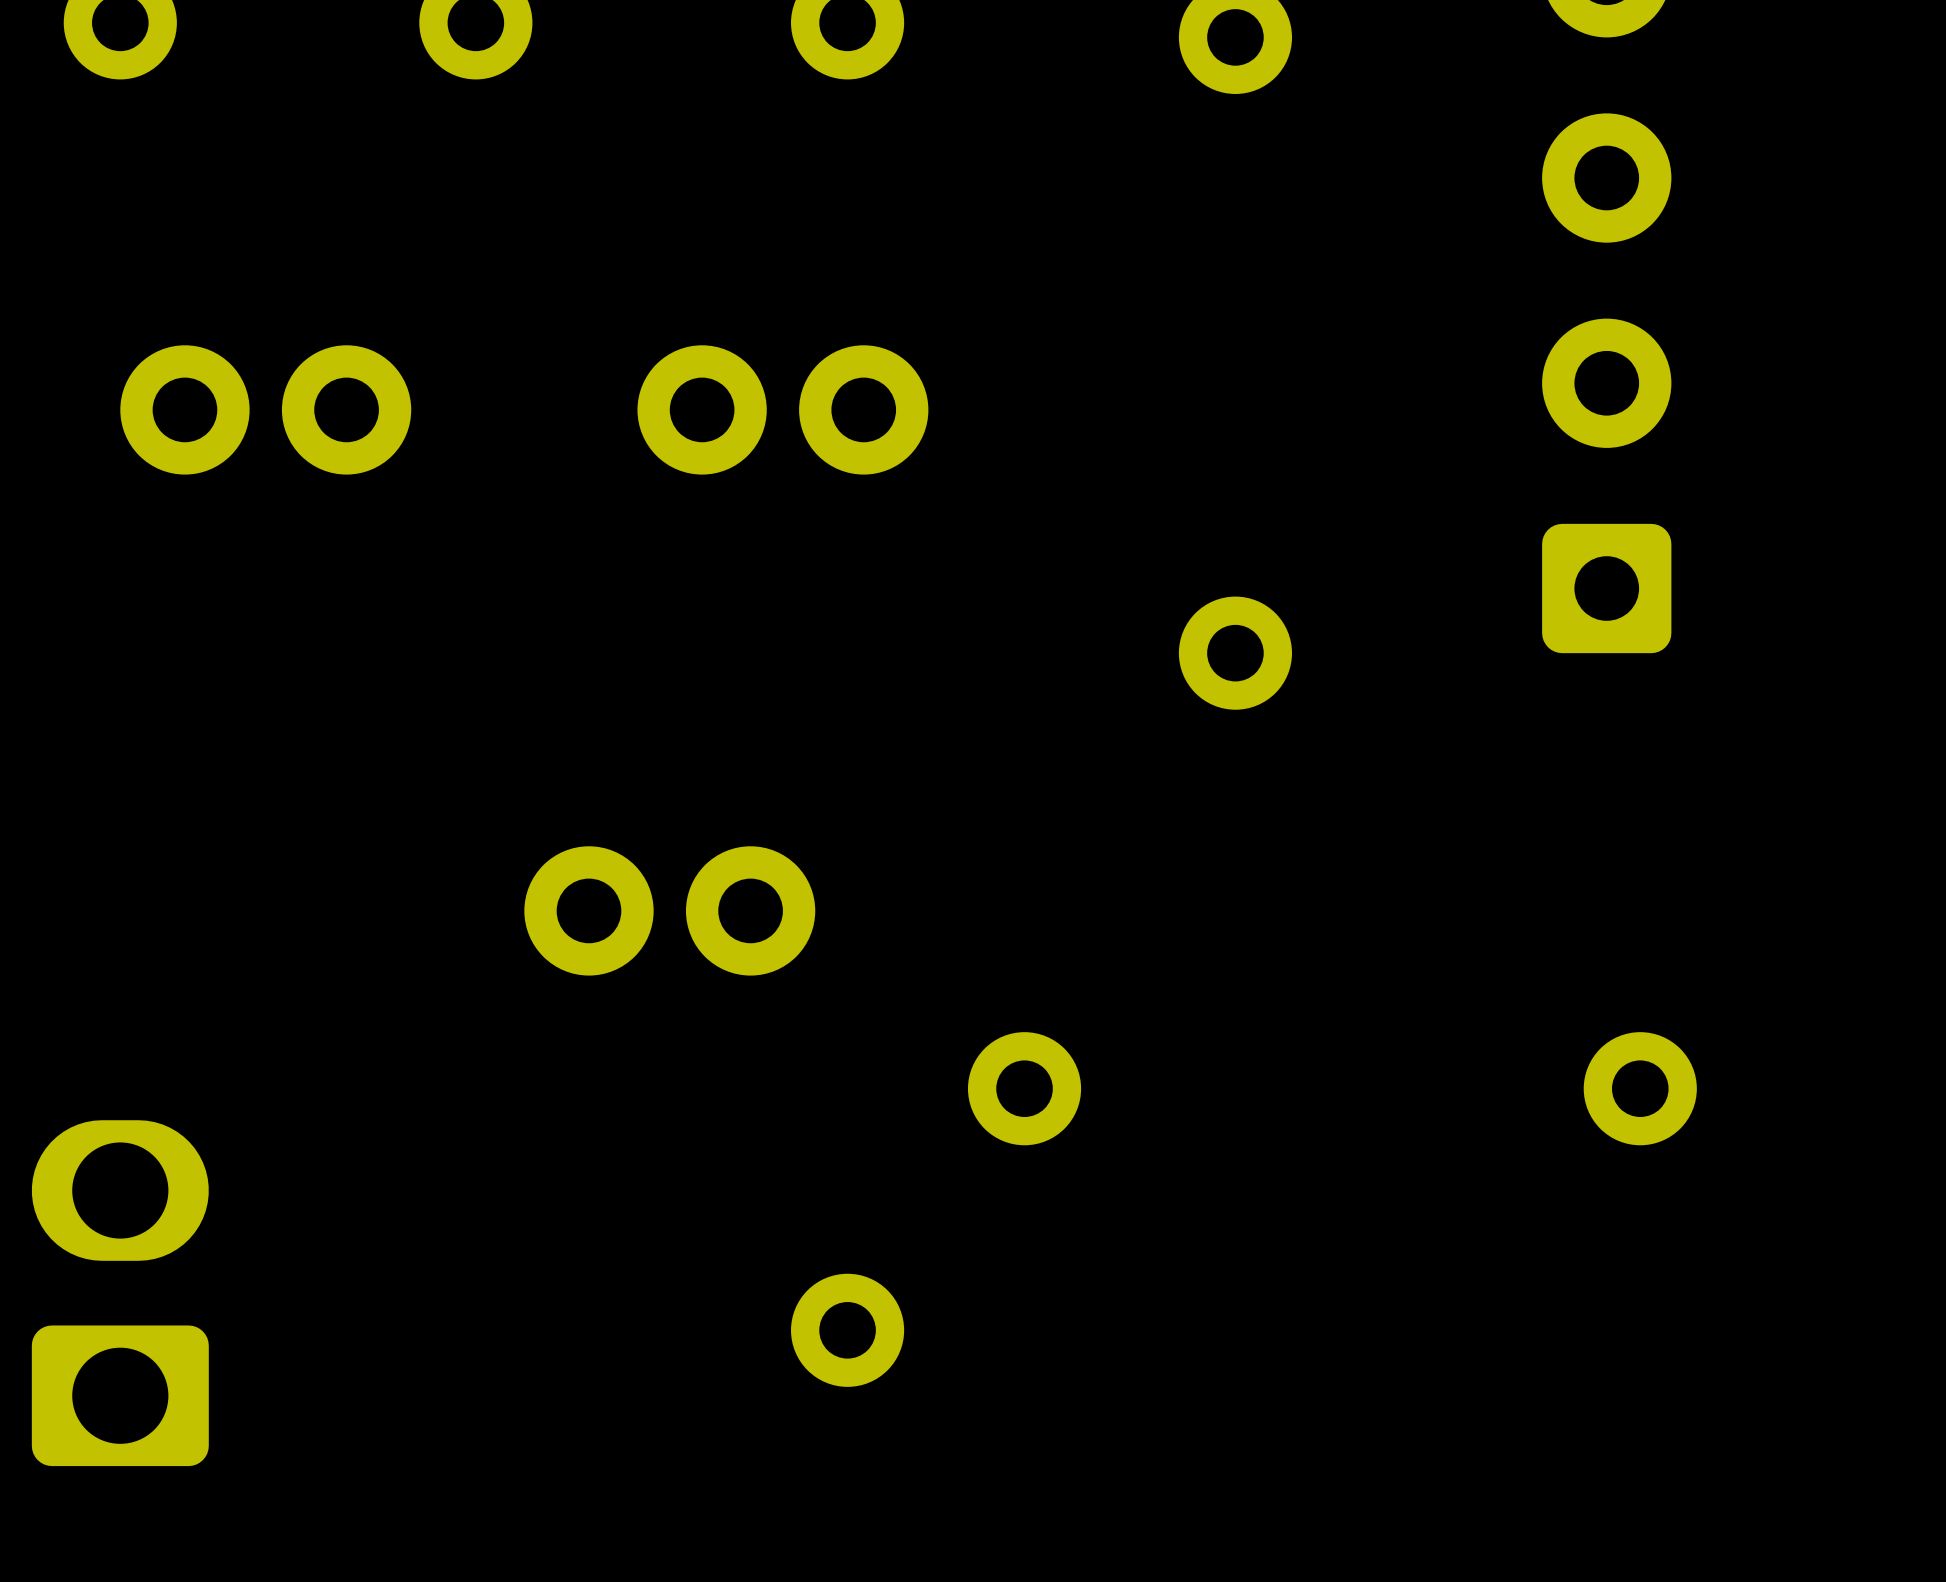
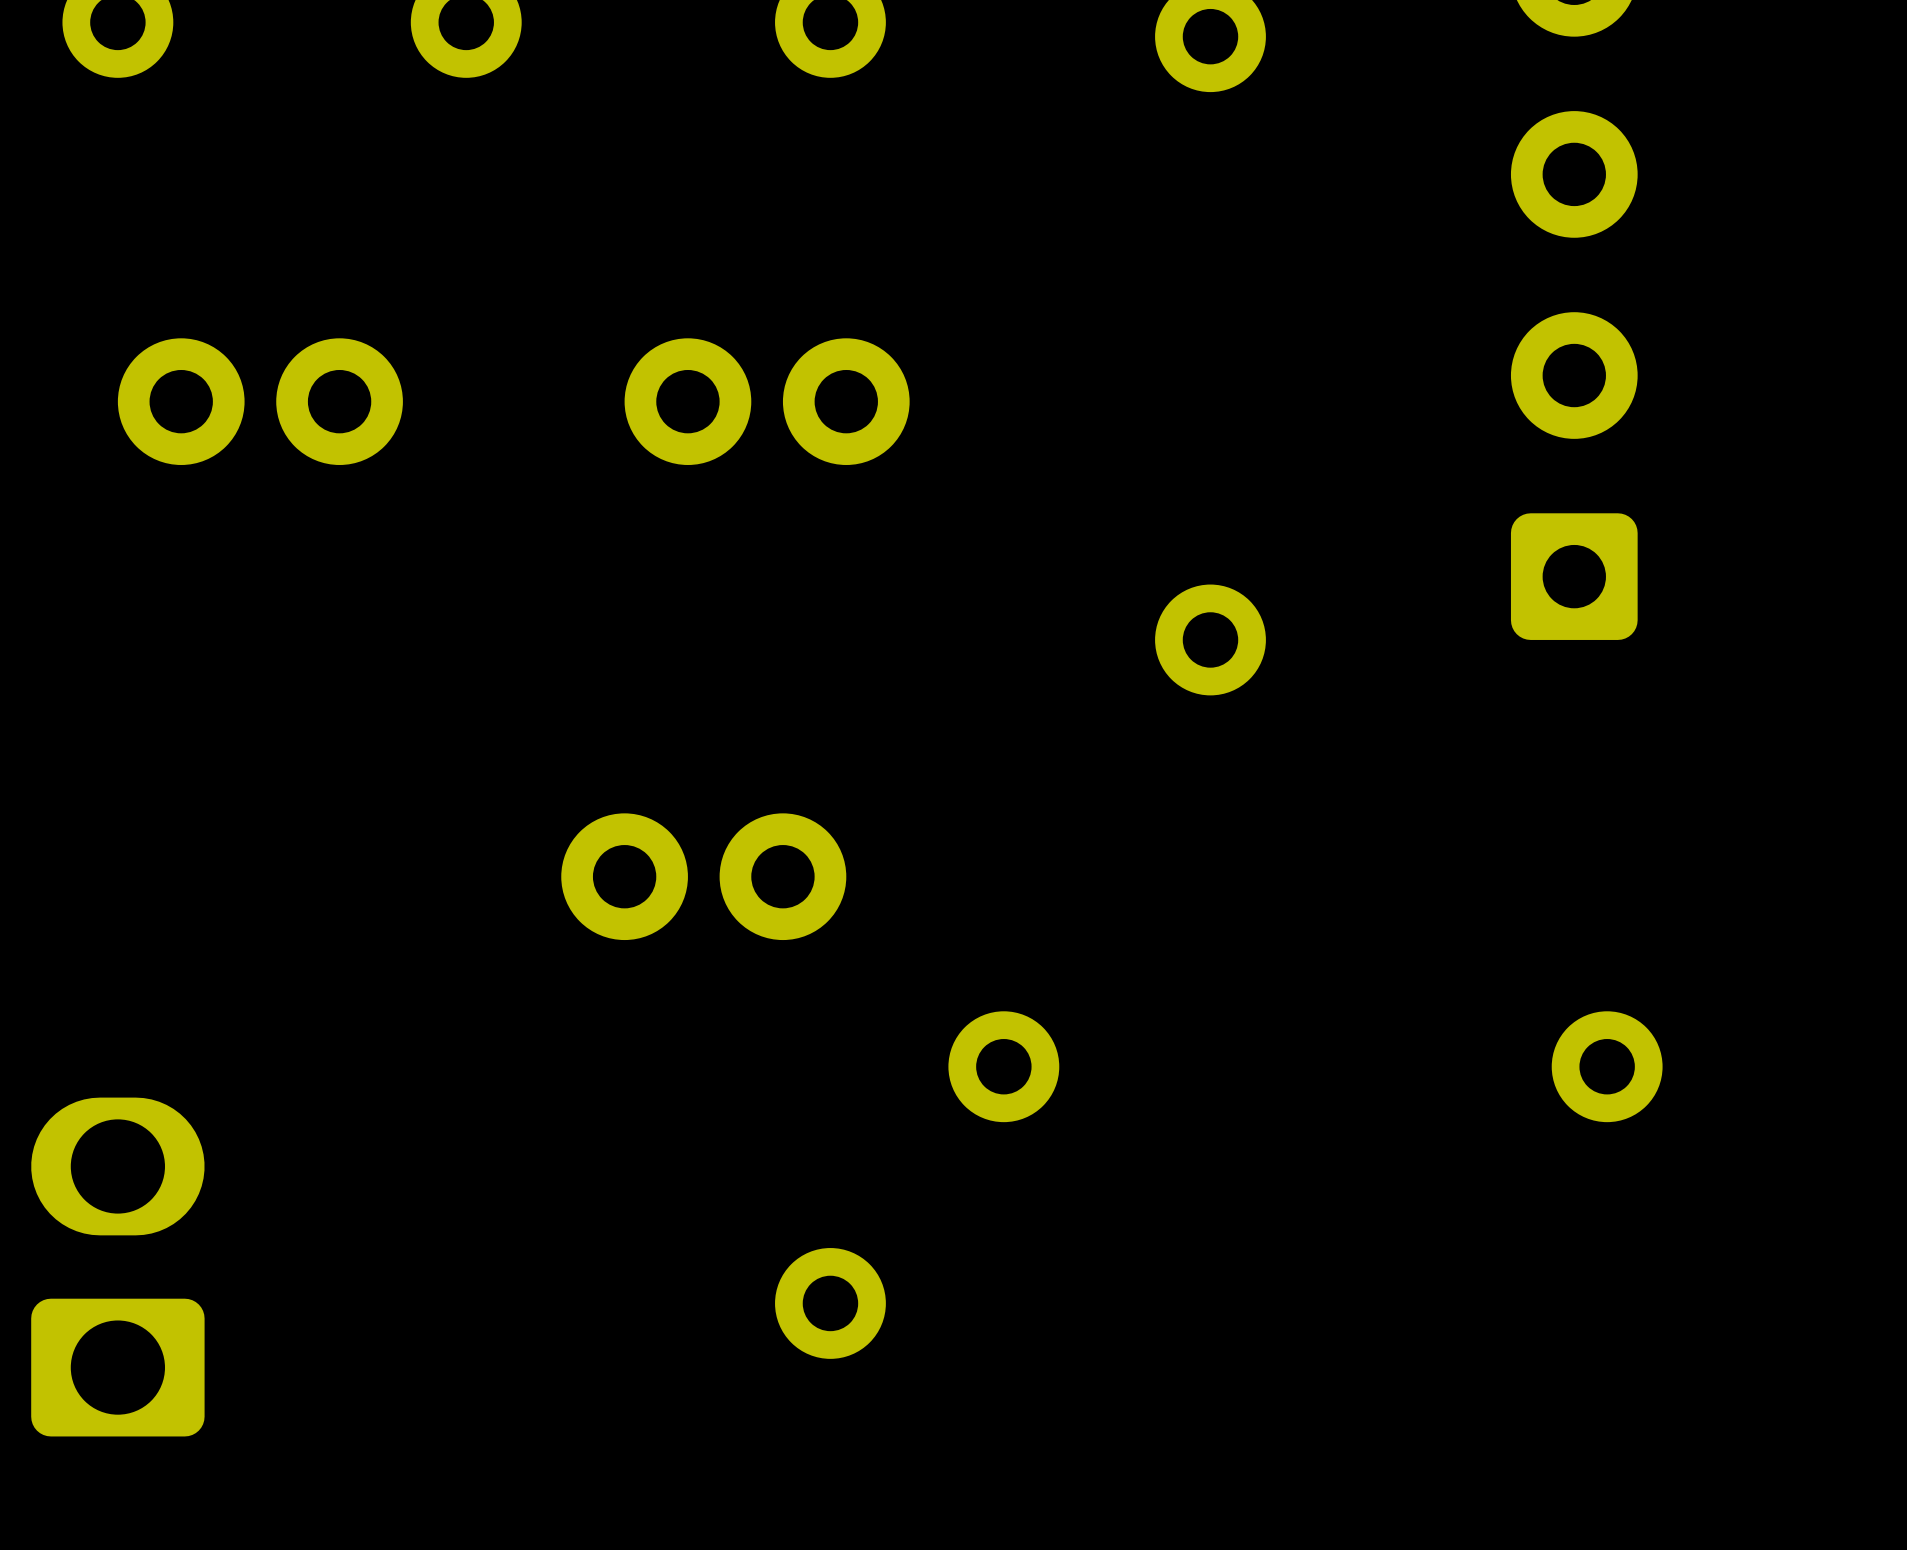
part position: (669, 910) -> (703, 876)

